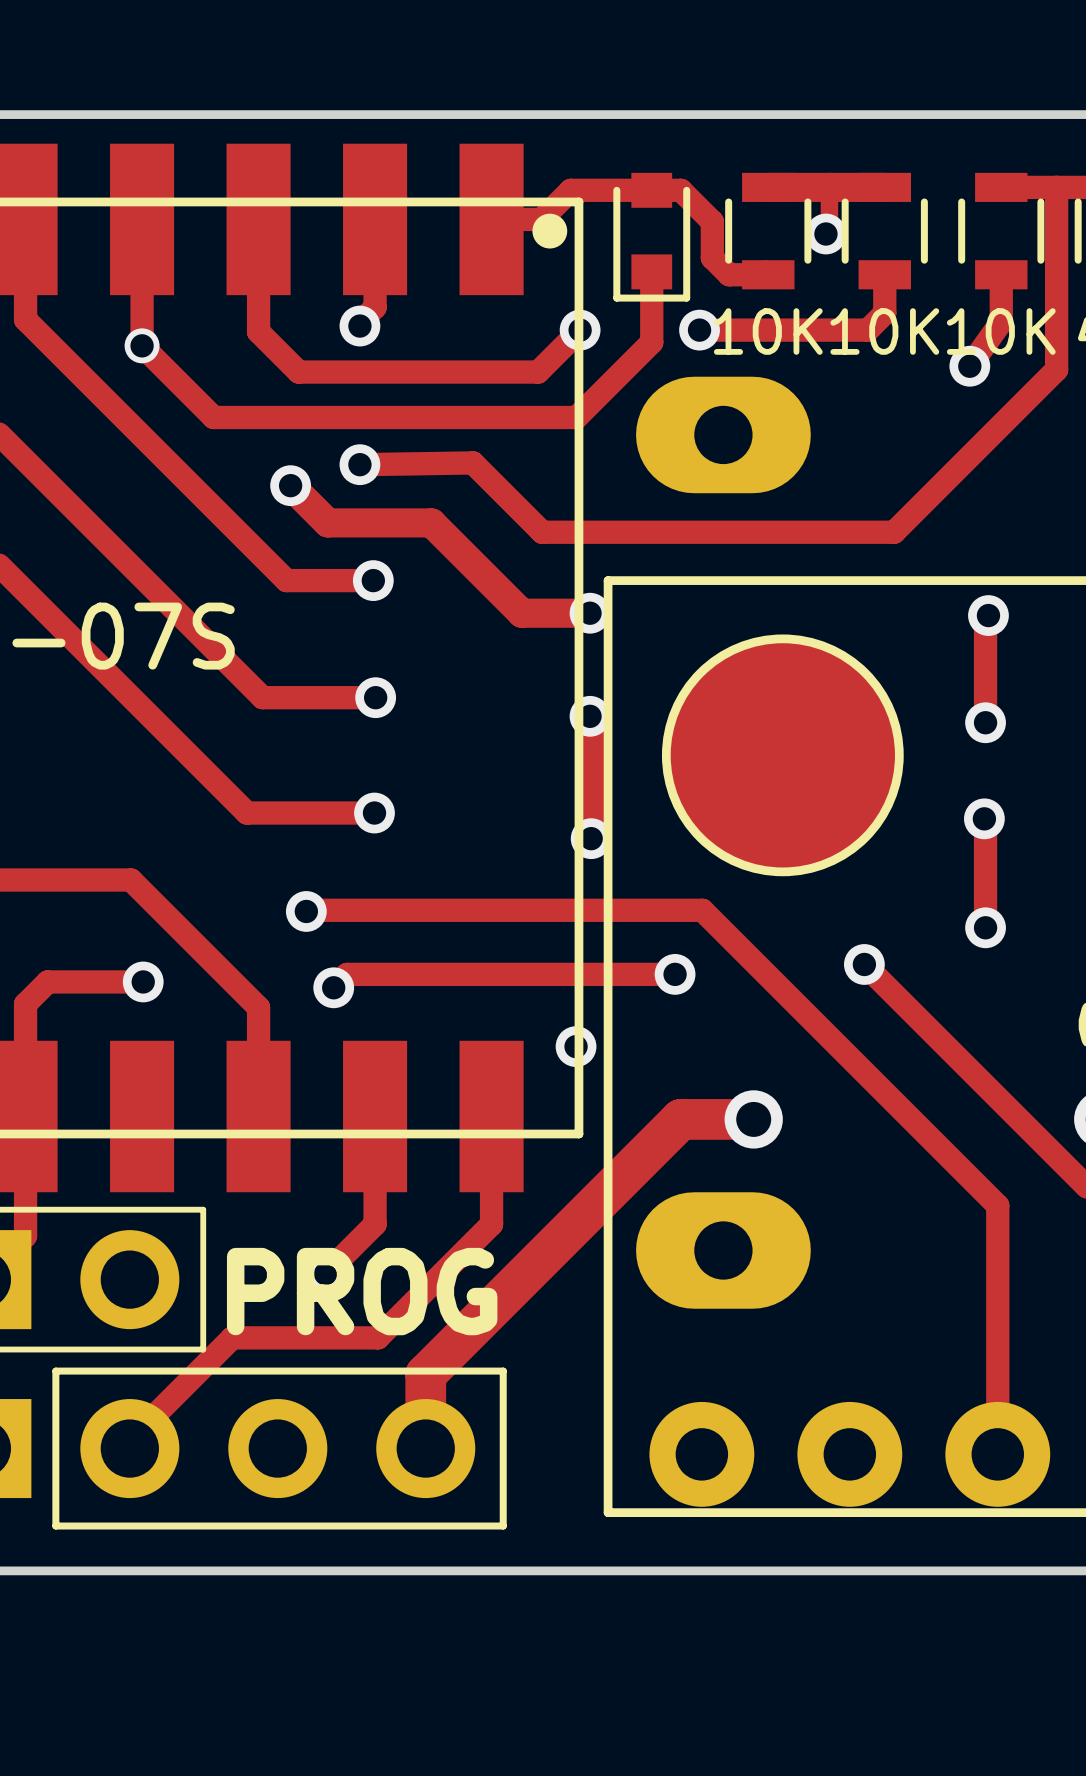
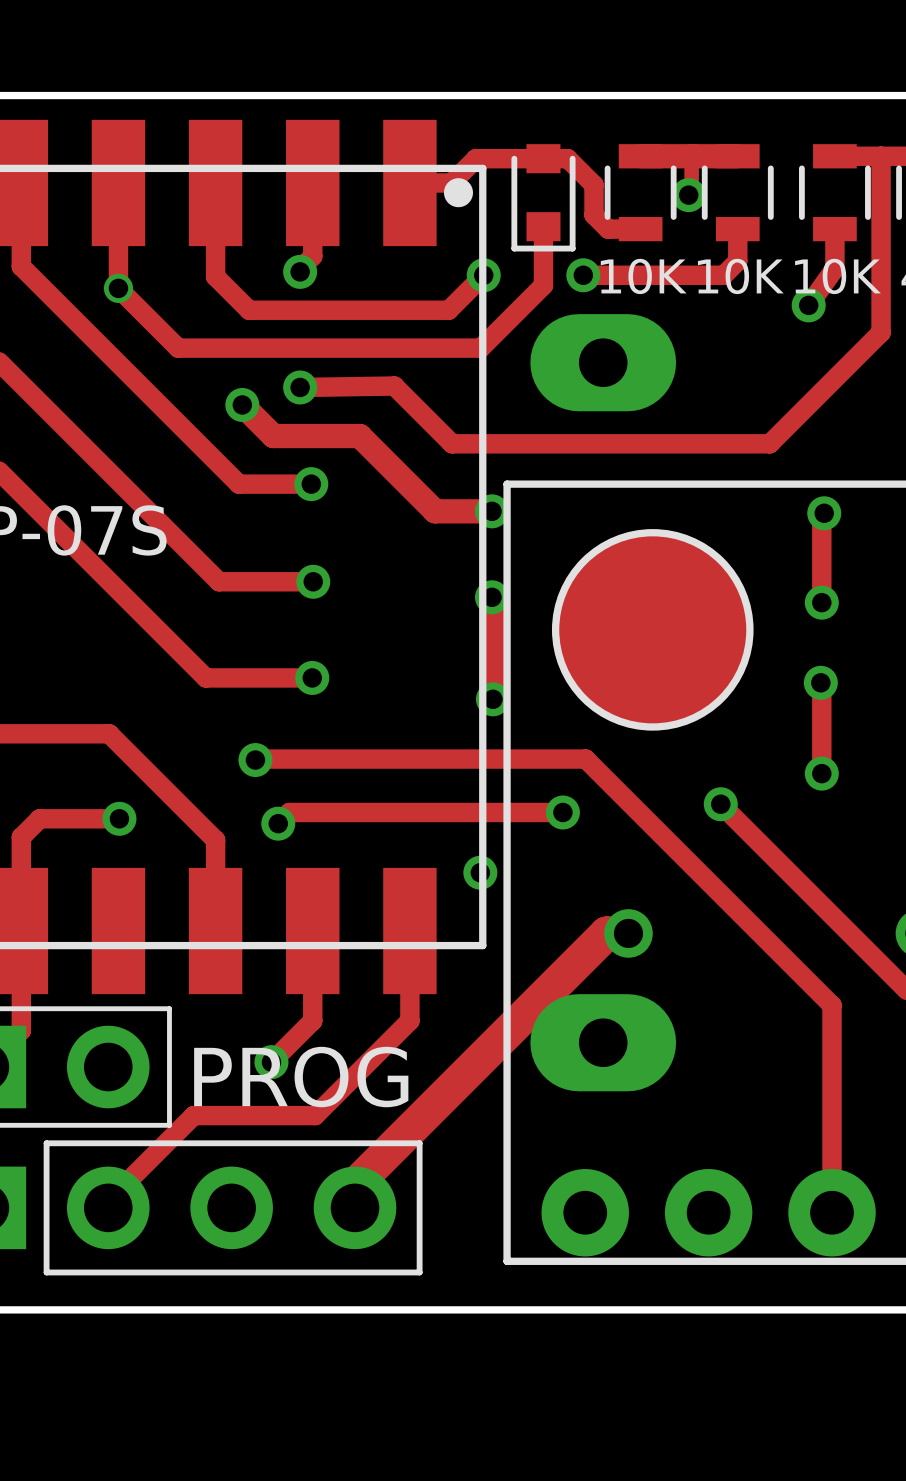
track: (1056, 369) (894, 532) -> (881, 308) (881, 332) (769, 443) (745, 443)
track: (727, 1119) (680, 1119) (425, 1374) (425, 1421) -> (606, 933) (355, 1185)

